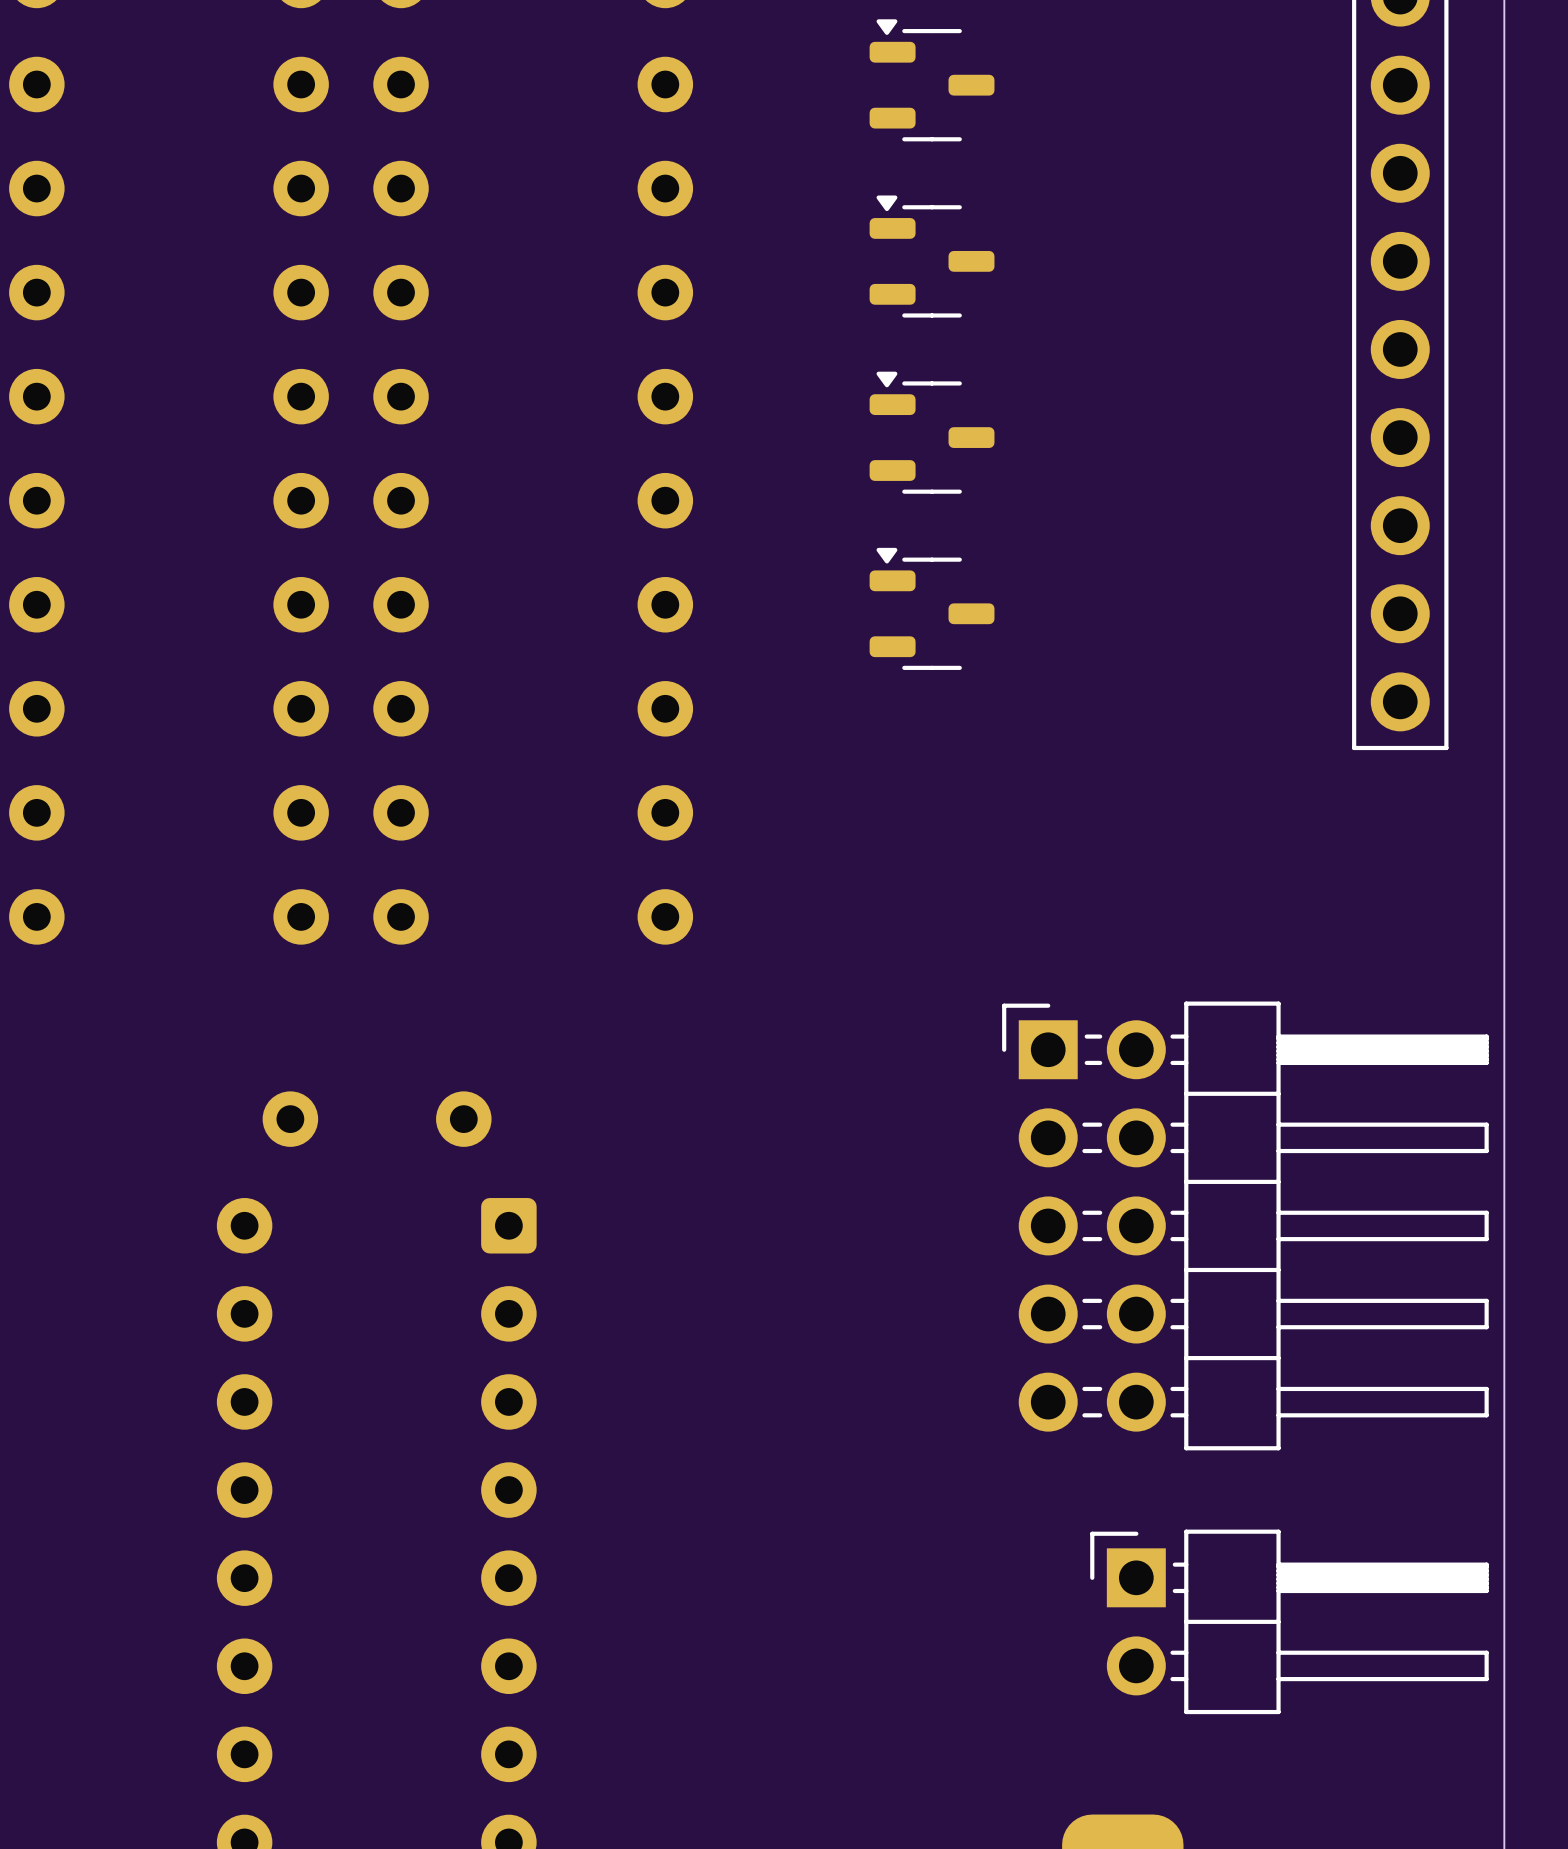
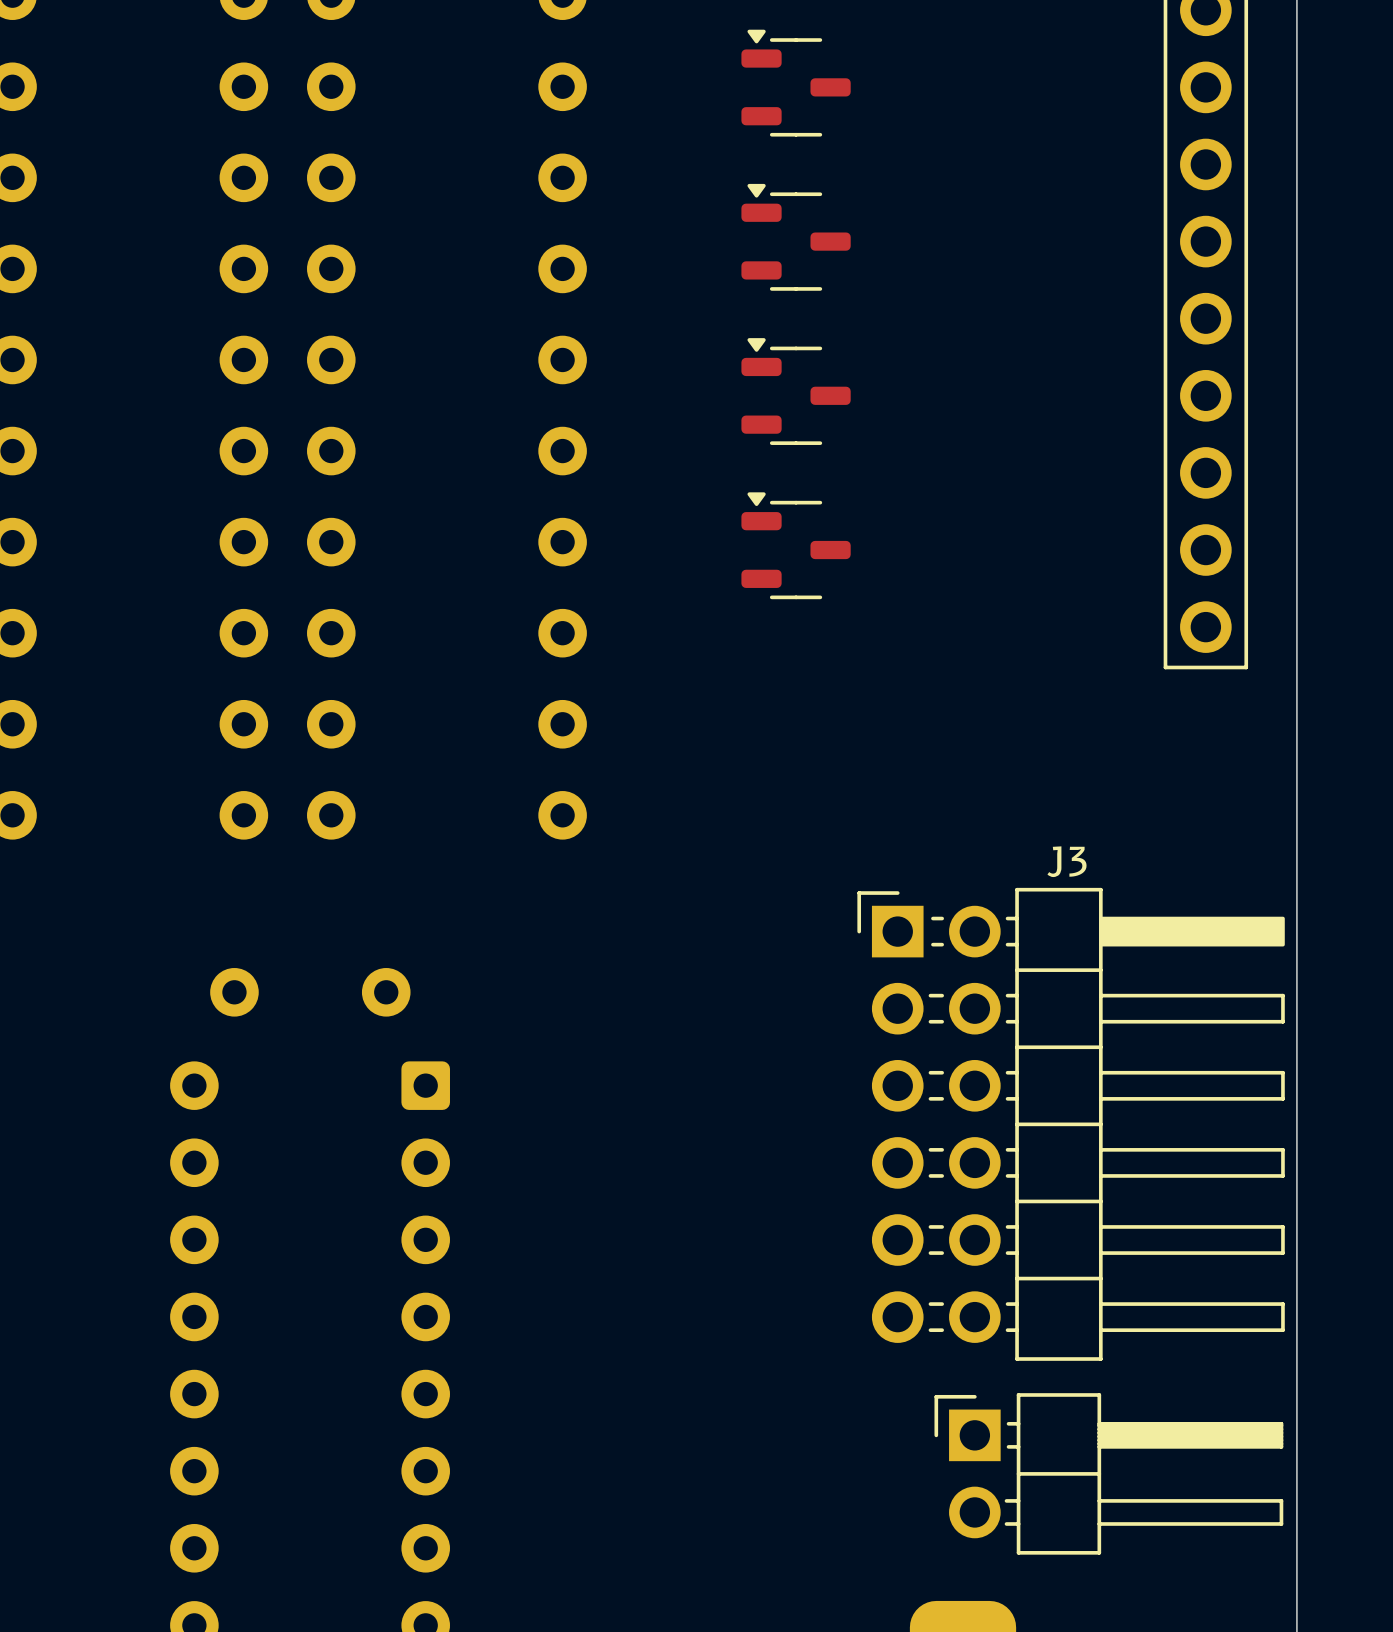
part: (1245, 1225) -> none
J3: none -> (1071, 1124)
part position: (1289, 1621) -> (1108, 1473)

